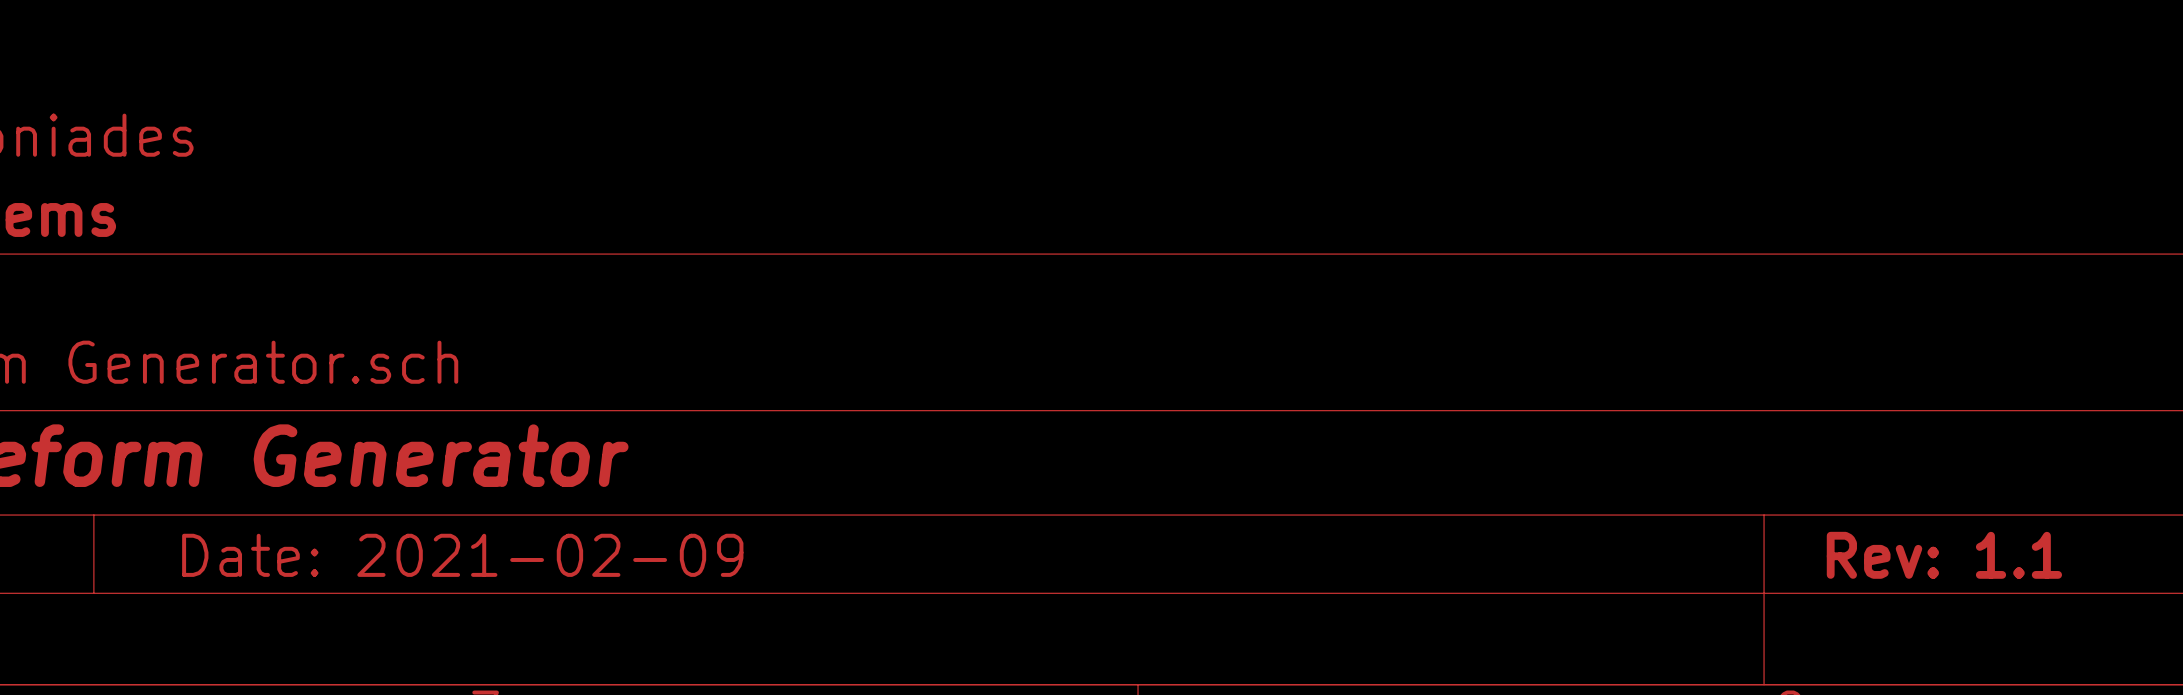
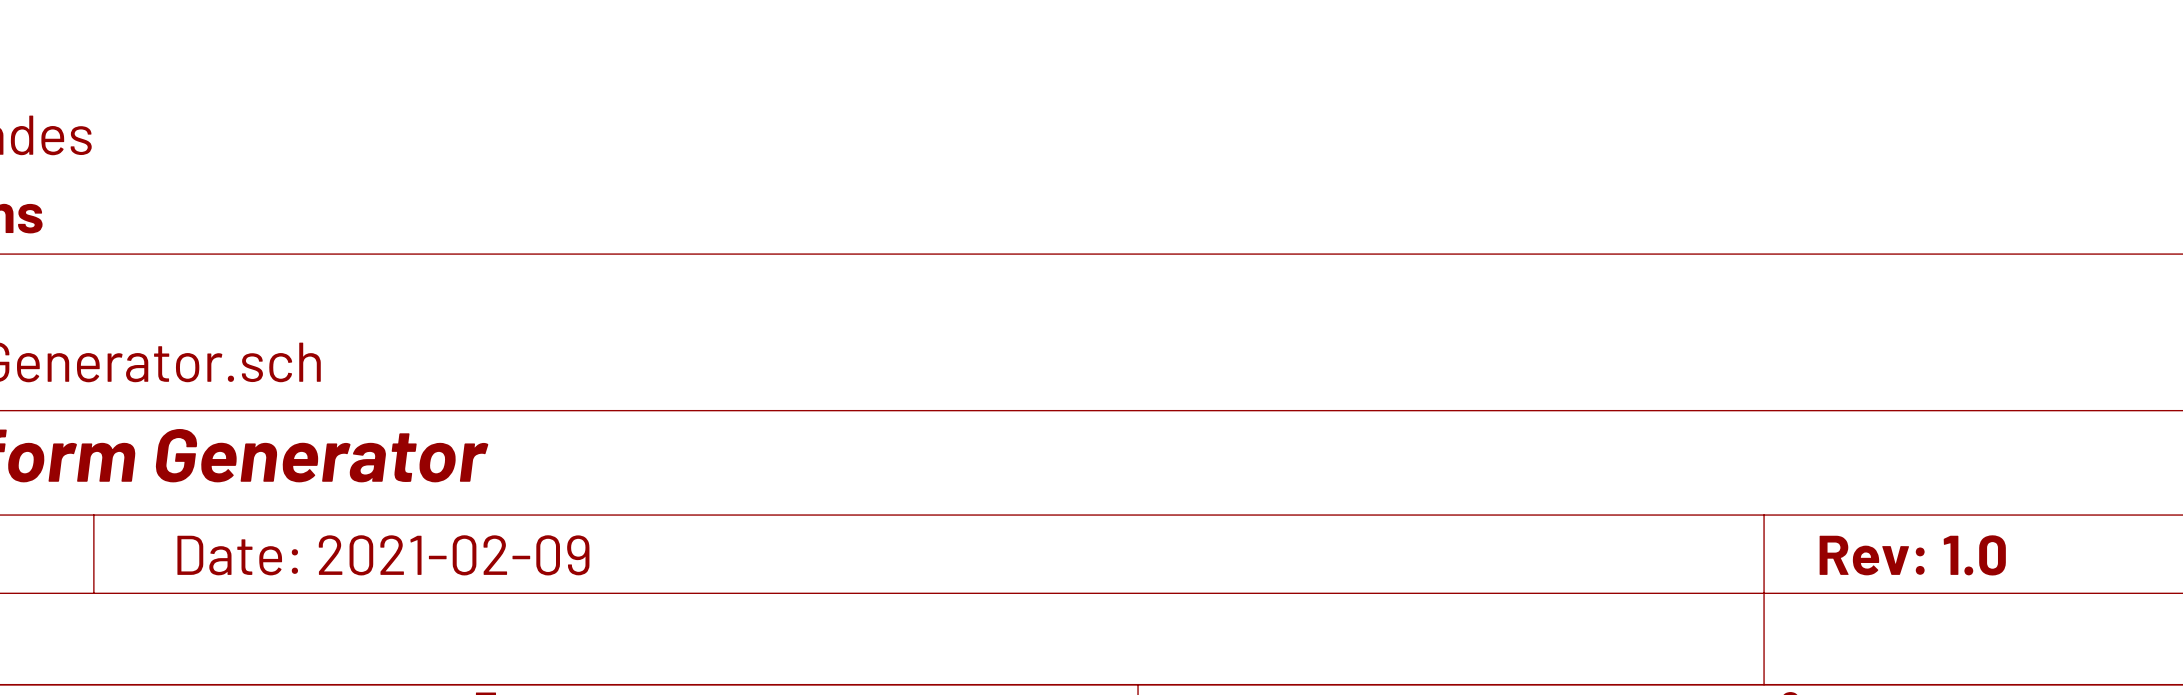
title block: Rev: 1.1 (1944, 555) -> Rev: 1.0 (1912, 555)

